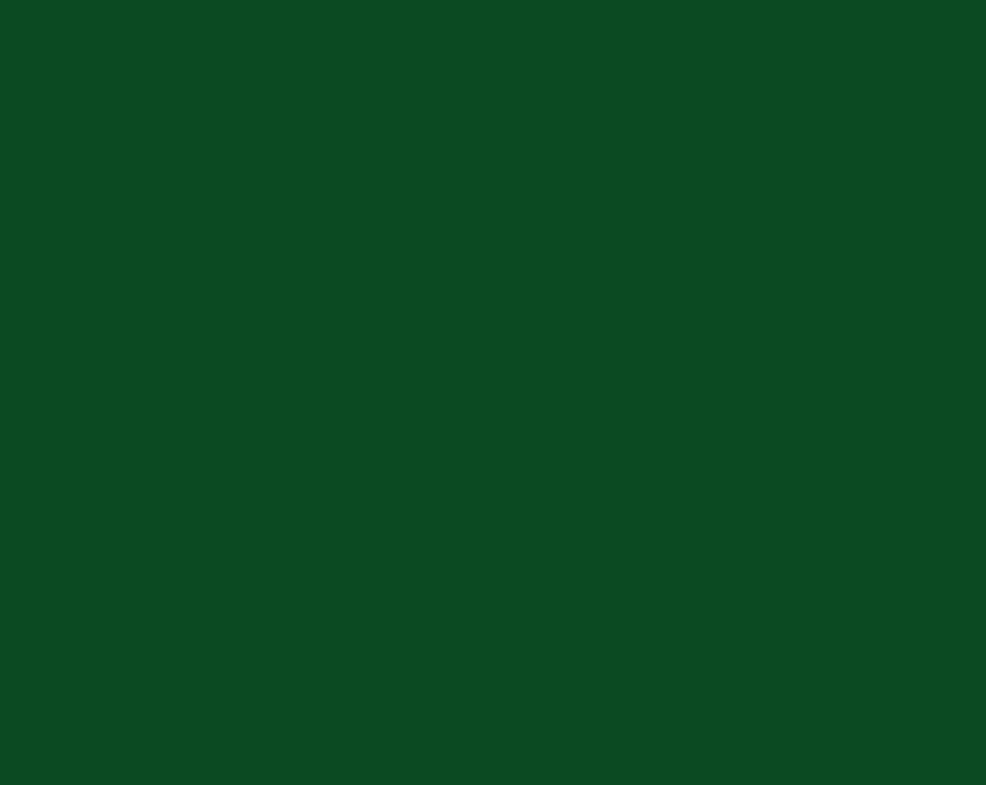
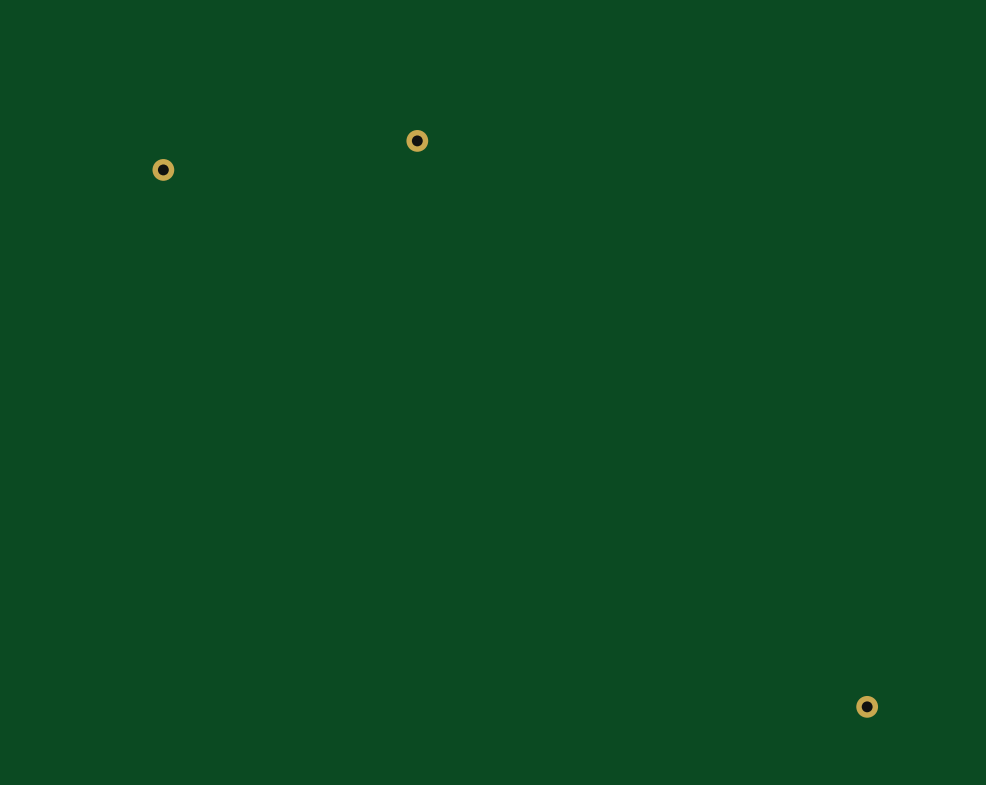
via: none -> (417, 140)
via: none -> (163, 169)
via: none -> (867, 706)

